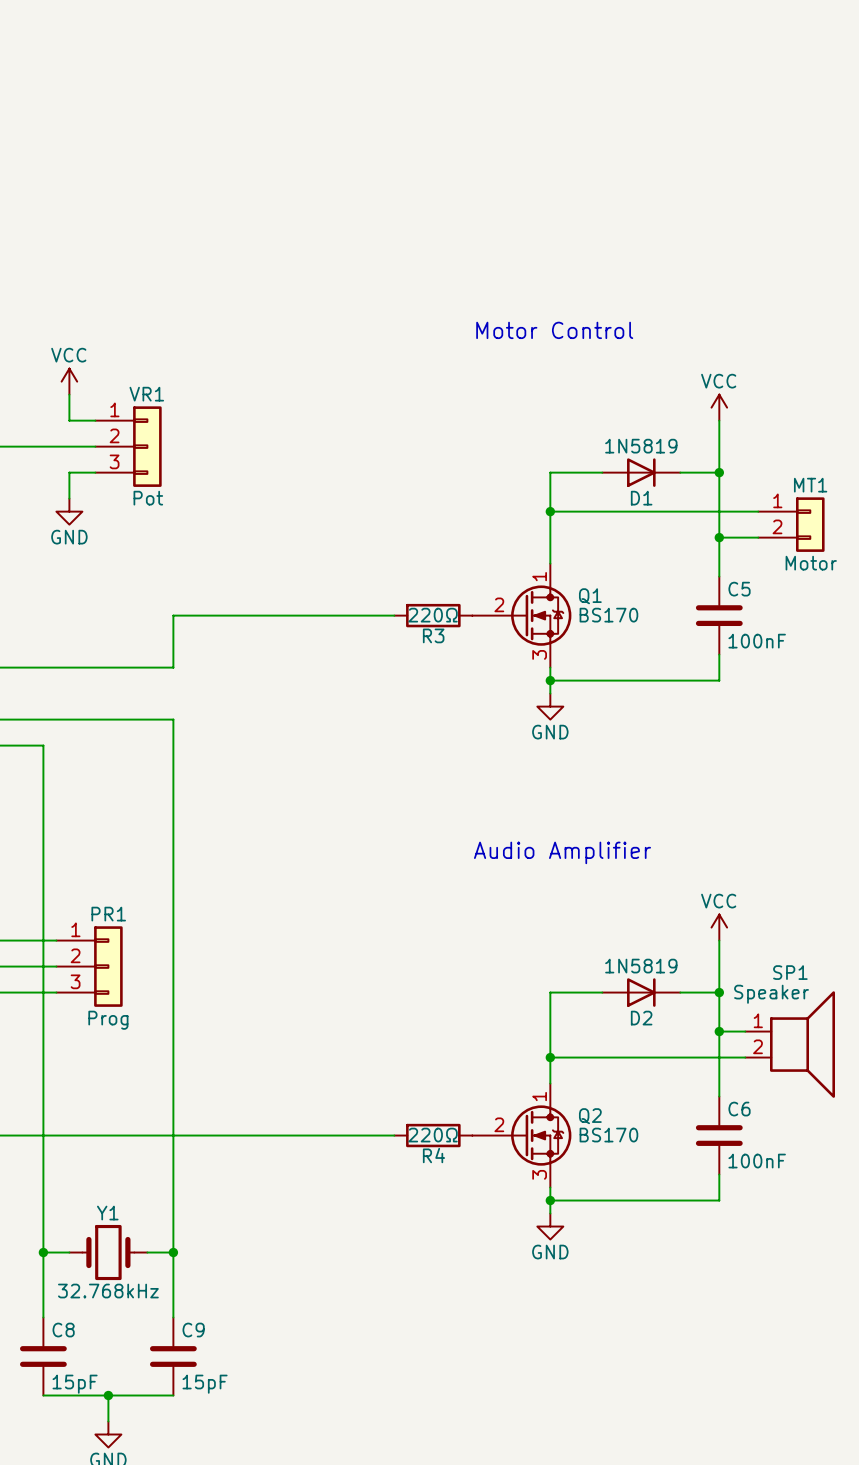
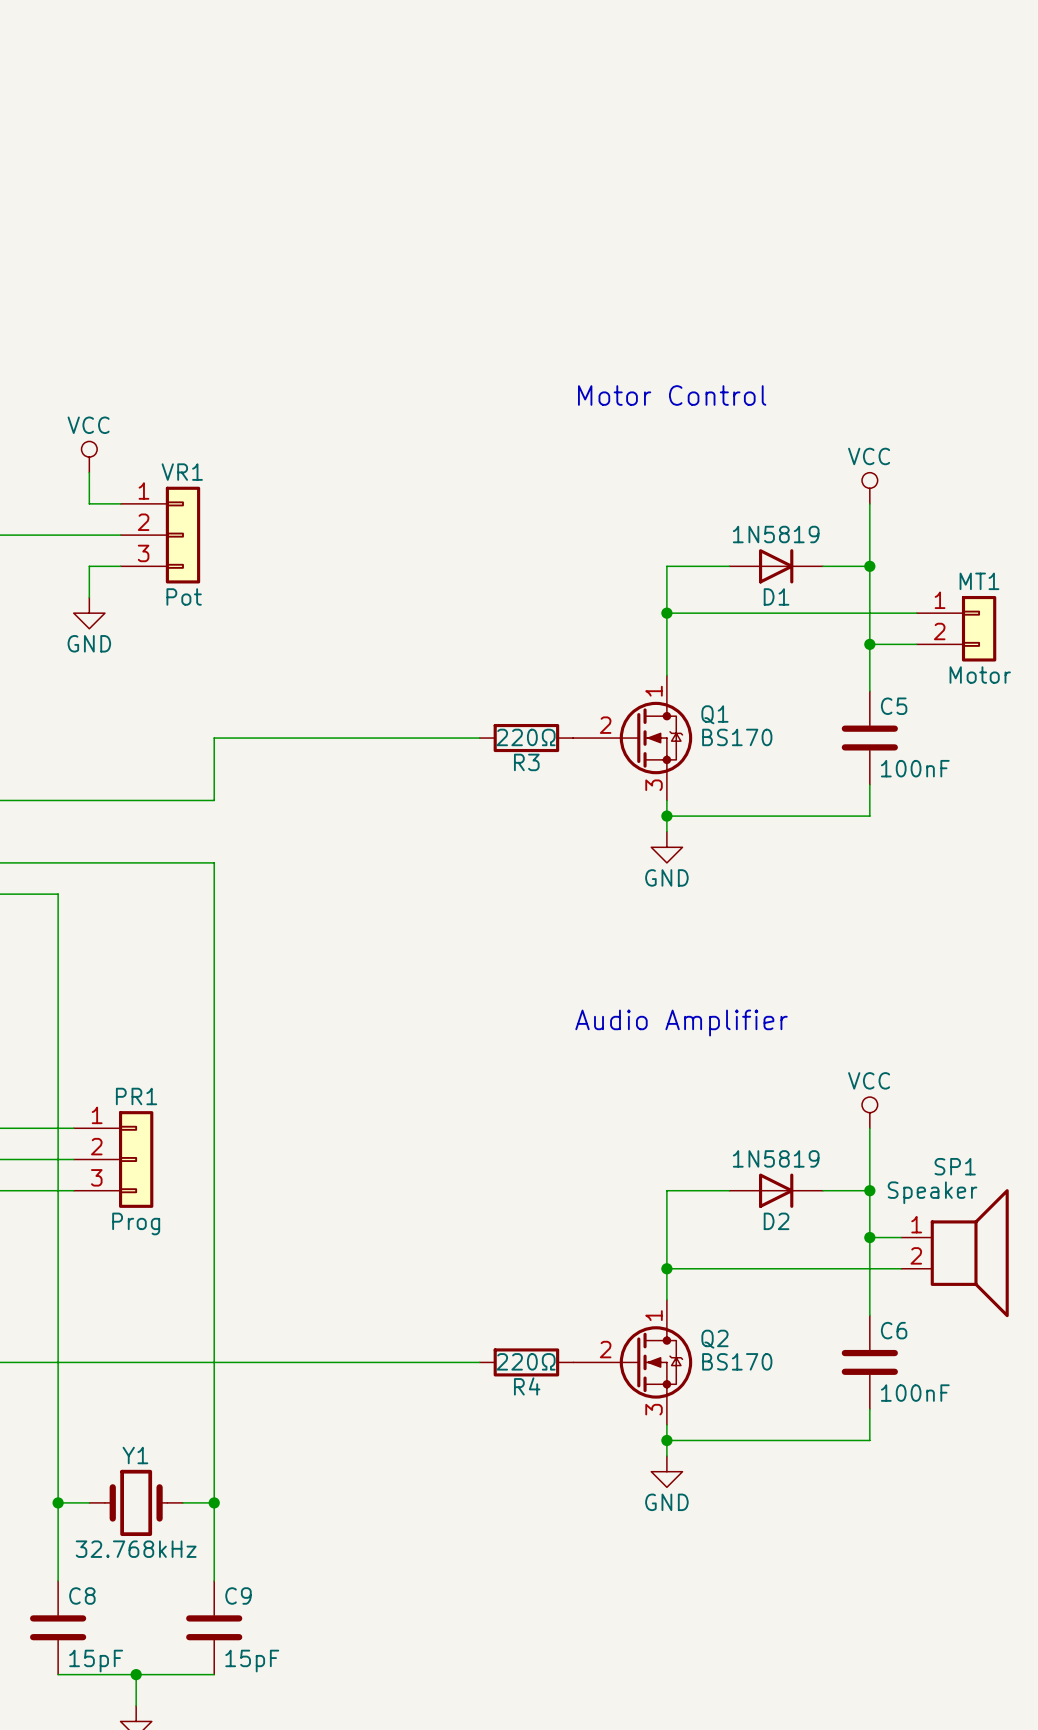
power symbol shape: [61, 368, 78, 395] -> [81, 441, 98, 473]
power symbol shape: [711, 394, 728, 421] -> [862, 472, 878, 504]
power symbol shape: [711, 914, 728, 941] -> [862, 1097, 878, 1129]

